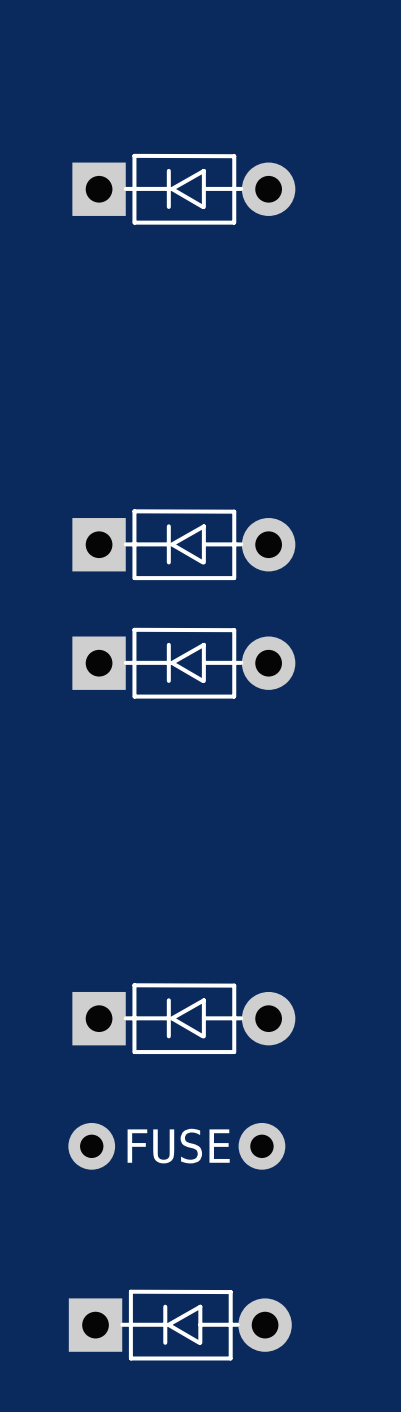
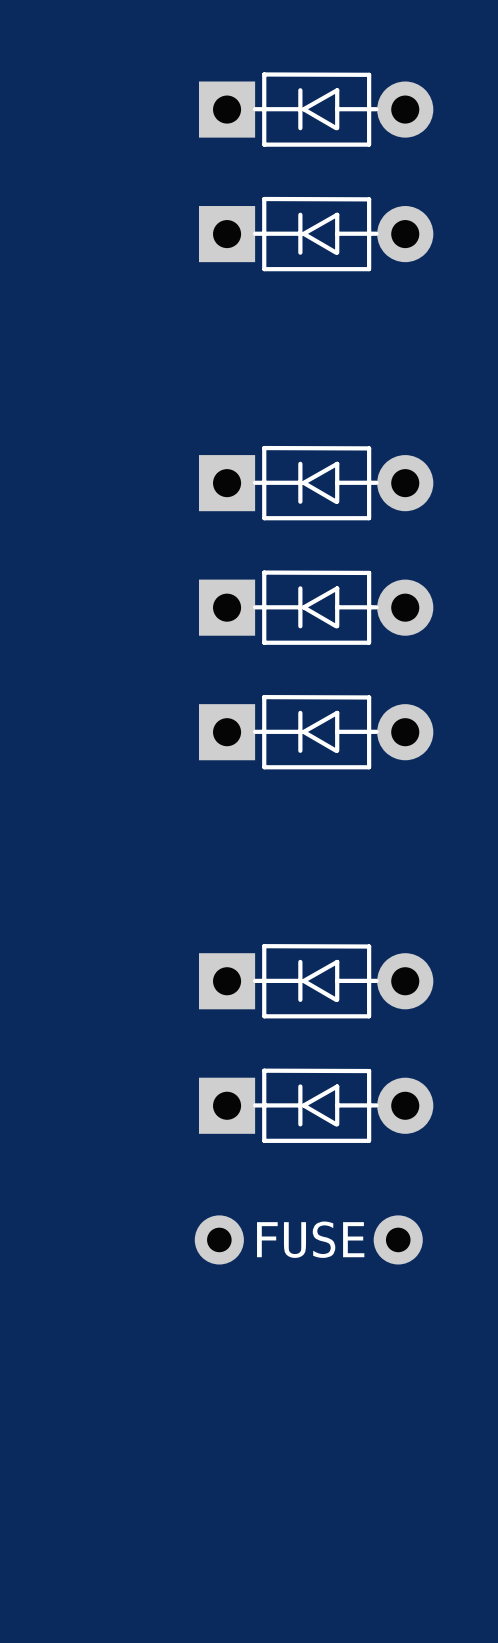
part: none -> (316, 109)
part: none -> (316, 483)
part position: (180, 1325) -> (316, 981)

